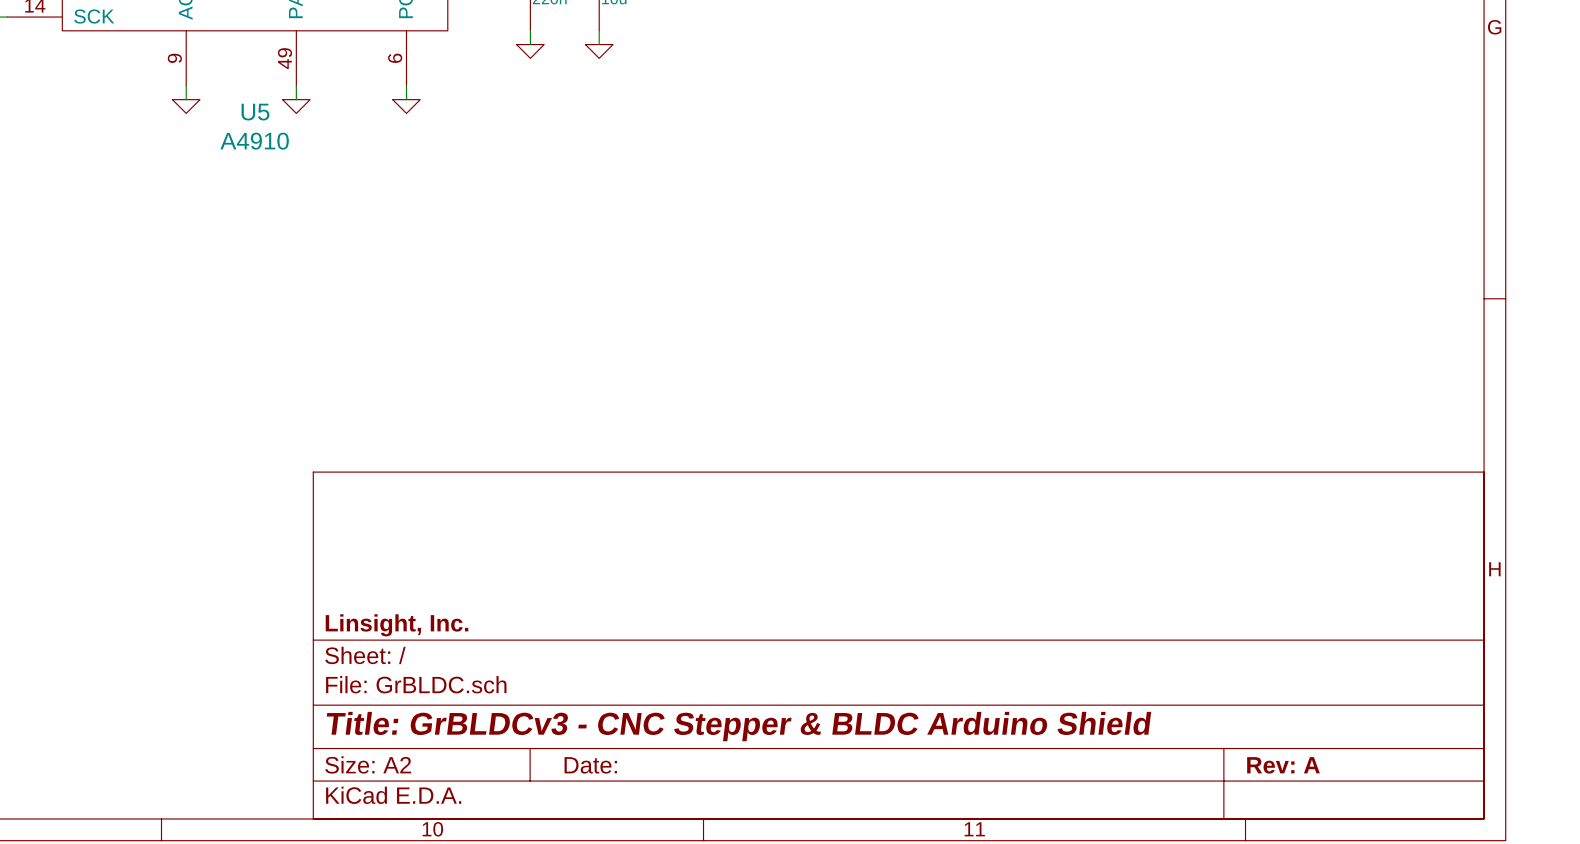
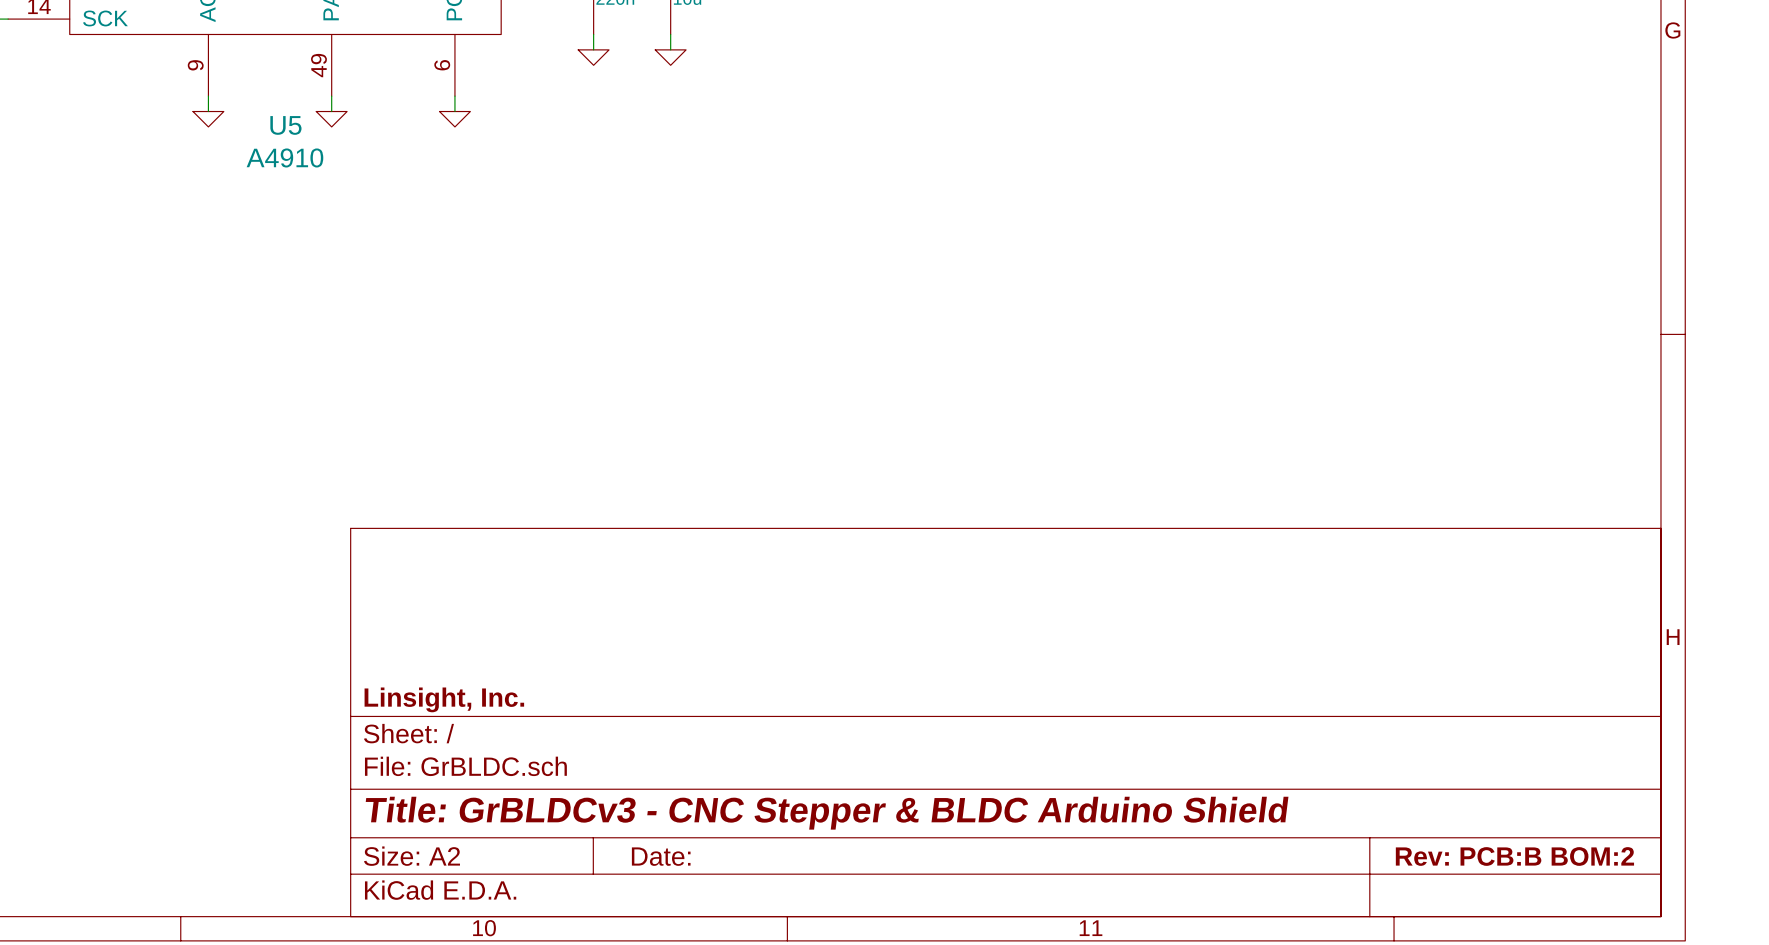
title block: Rev: A (1283, 765) -> Rev: PCB:B BOM:2 (1514, 856)

